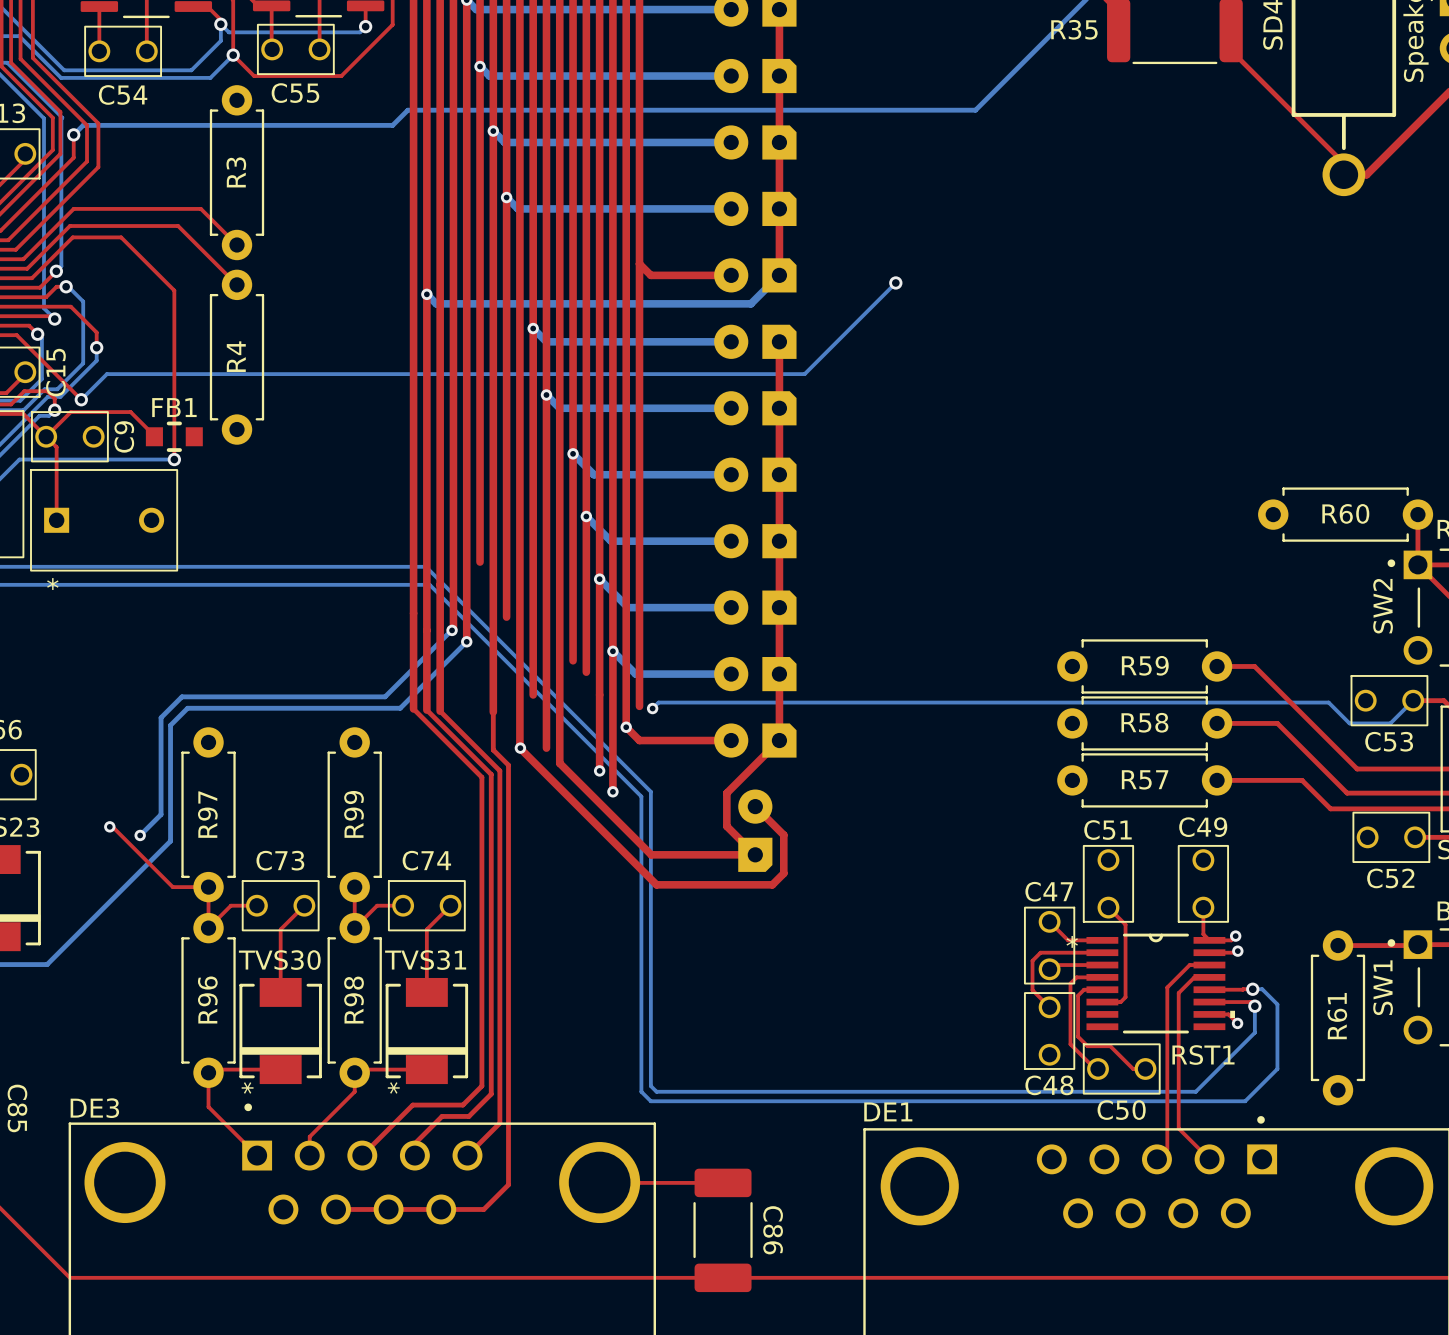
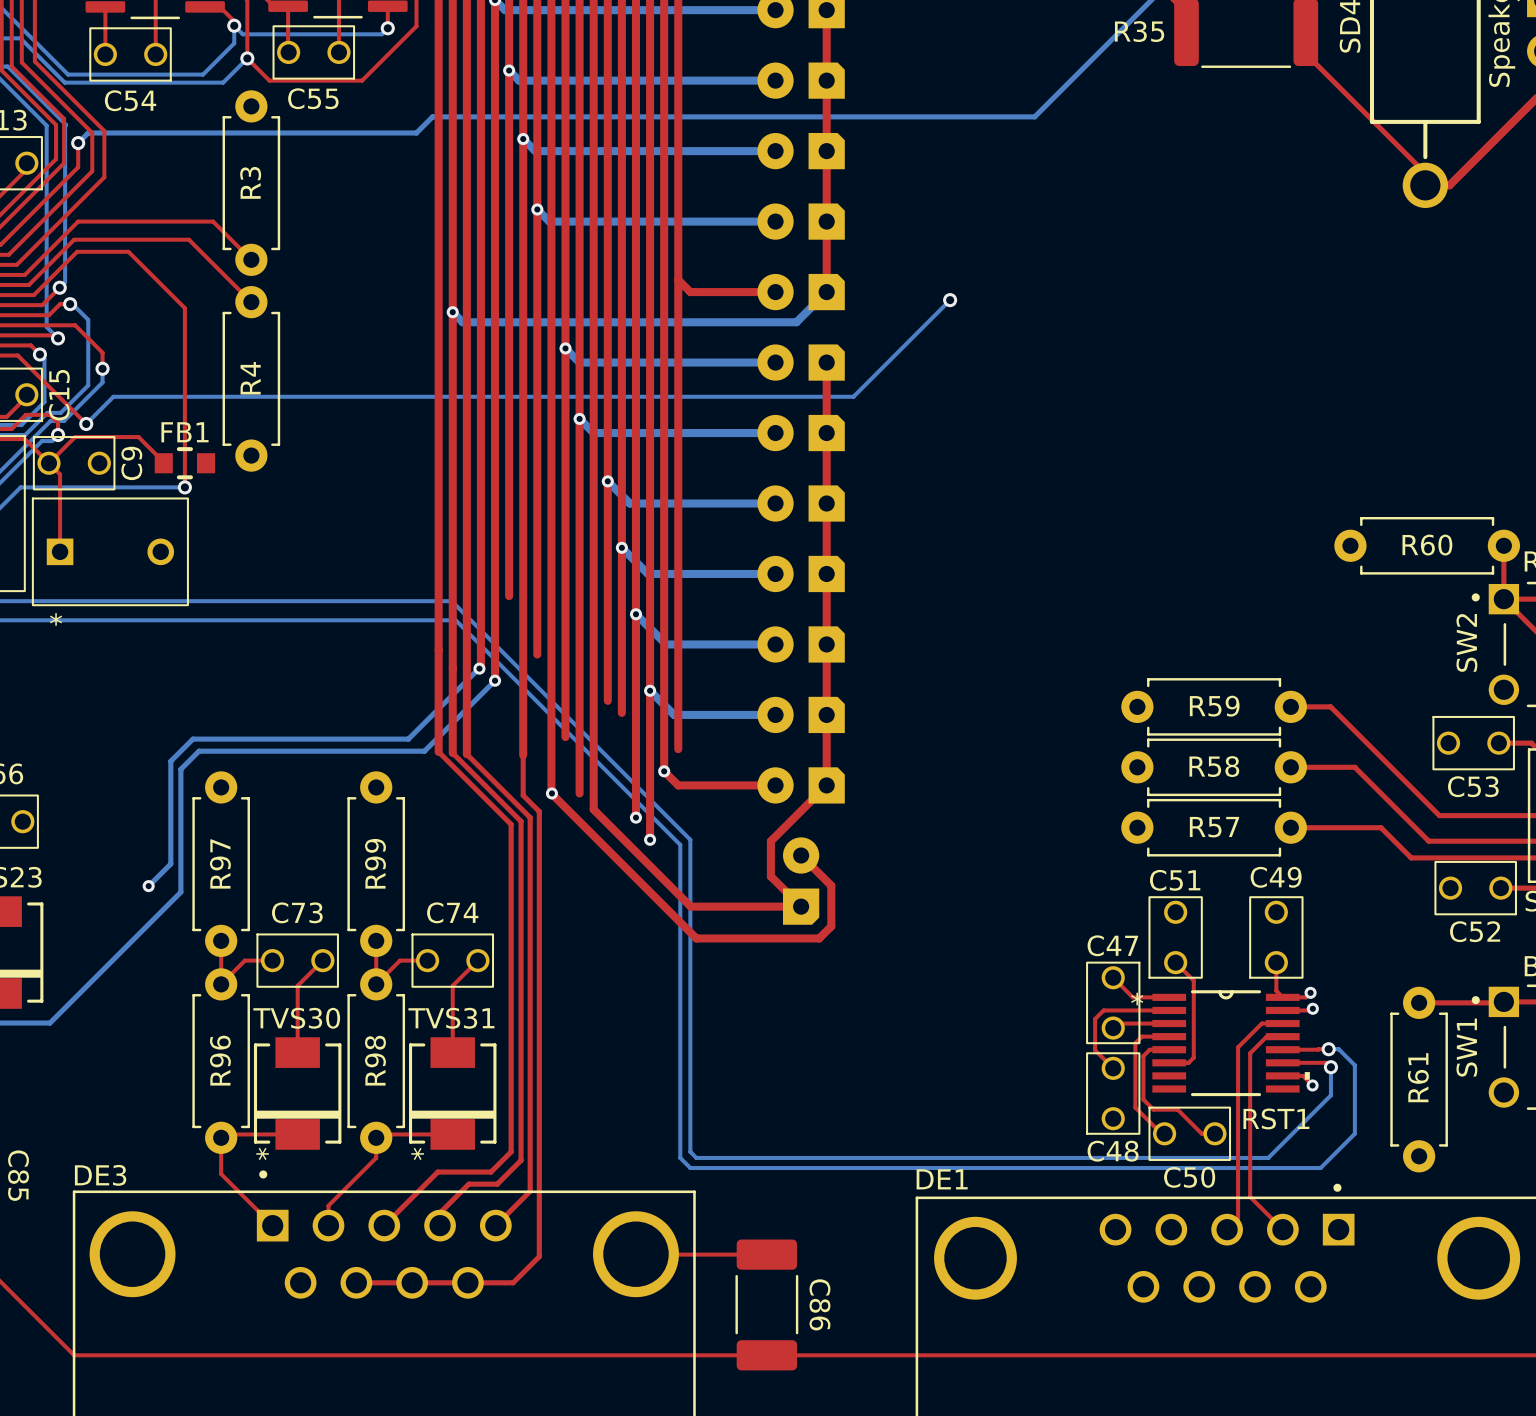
bottom track: (1413, 700) (1390, 723) (1349, 723) (1328, 702) (658, 702) (652, 708) -> none
via: (652, 708) -> none
top track: (109, 826) (112, 826) (172, 887) (208, 887) -> none
via: (109, 826) -> none

